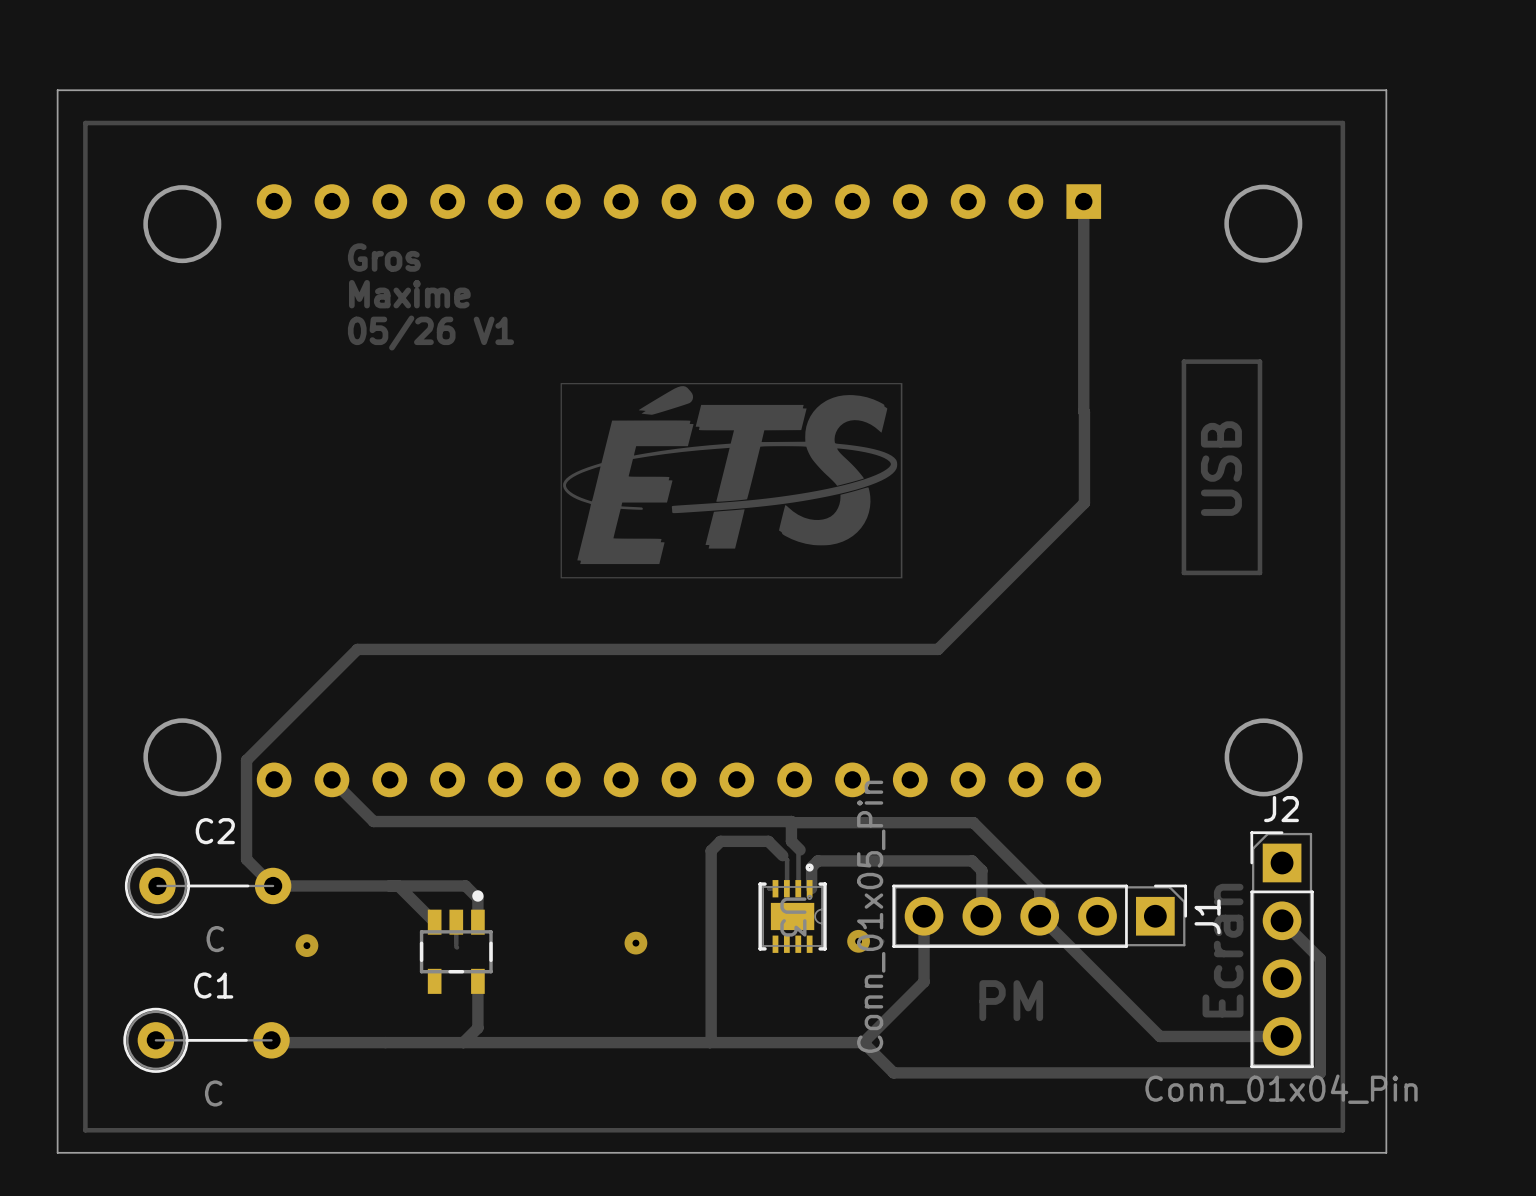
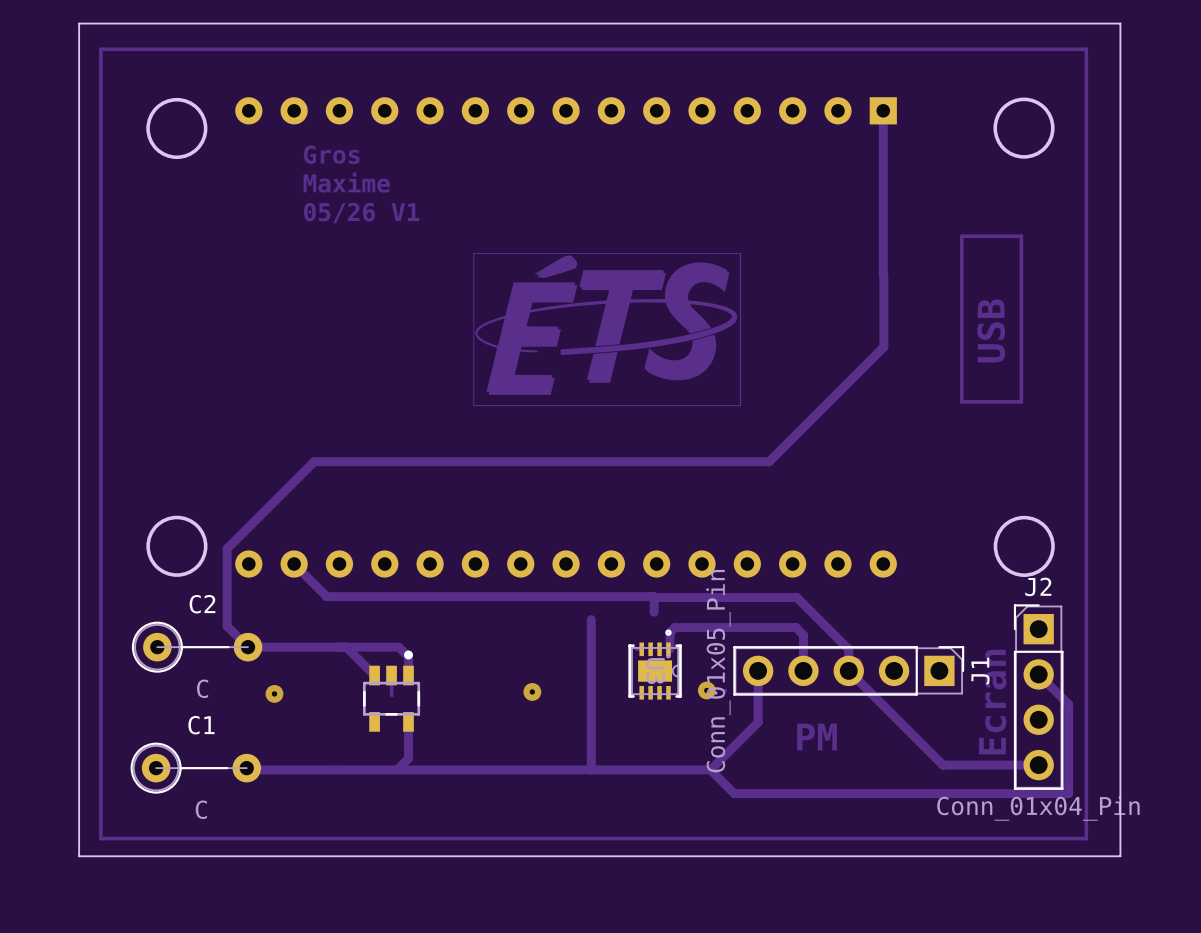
track: (791, 841) (800, 850) (798, 851) (798, 888) -> none
track: (711, 850) (720, 841) (768, 841) (787, 860) (787, 888) -> none

